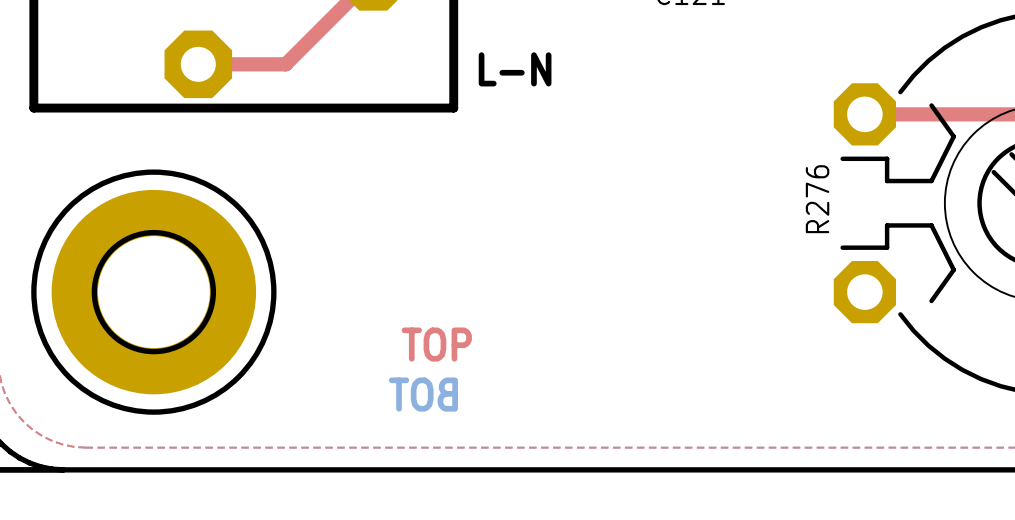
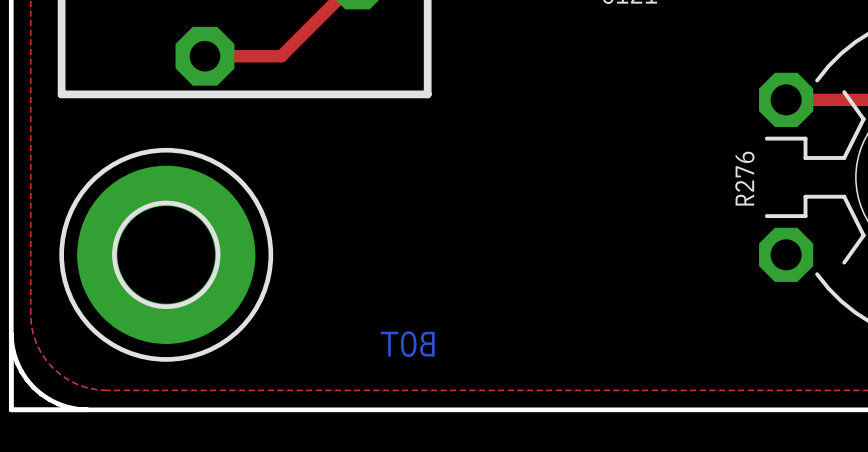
text: L-N (515, 69) -> none
text: TOP (436, 344) -> none

